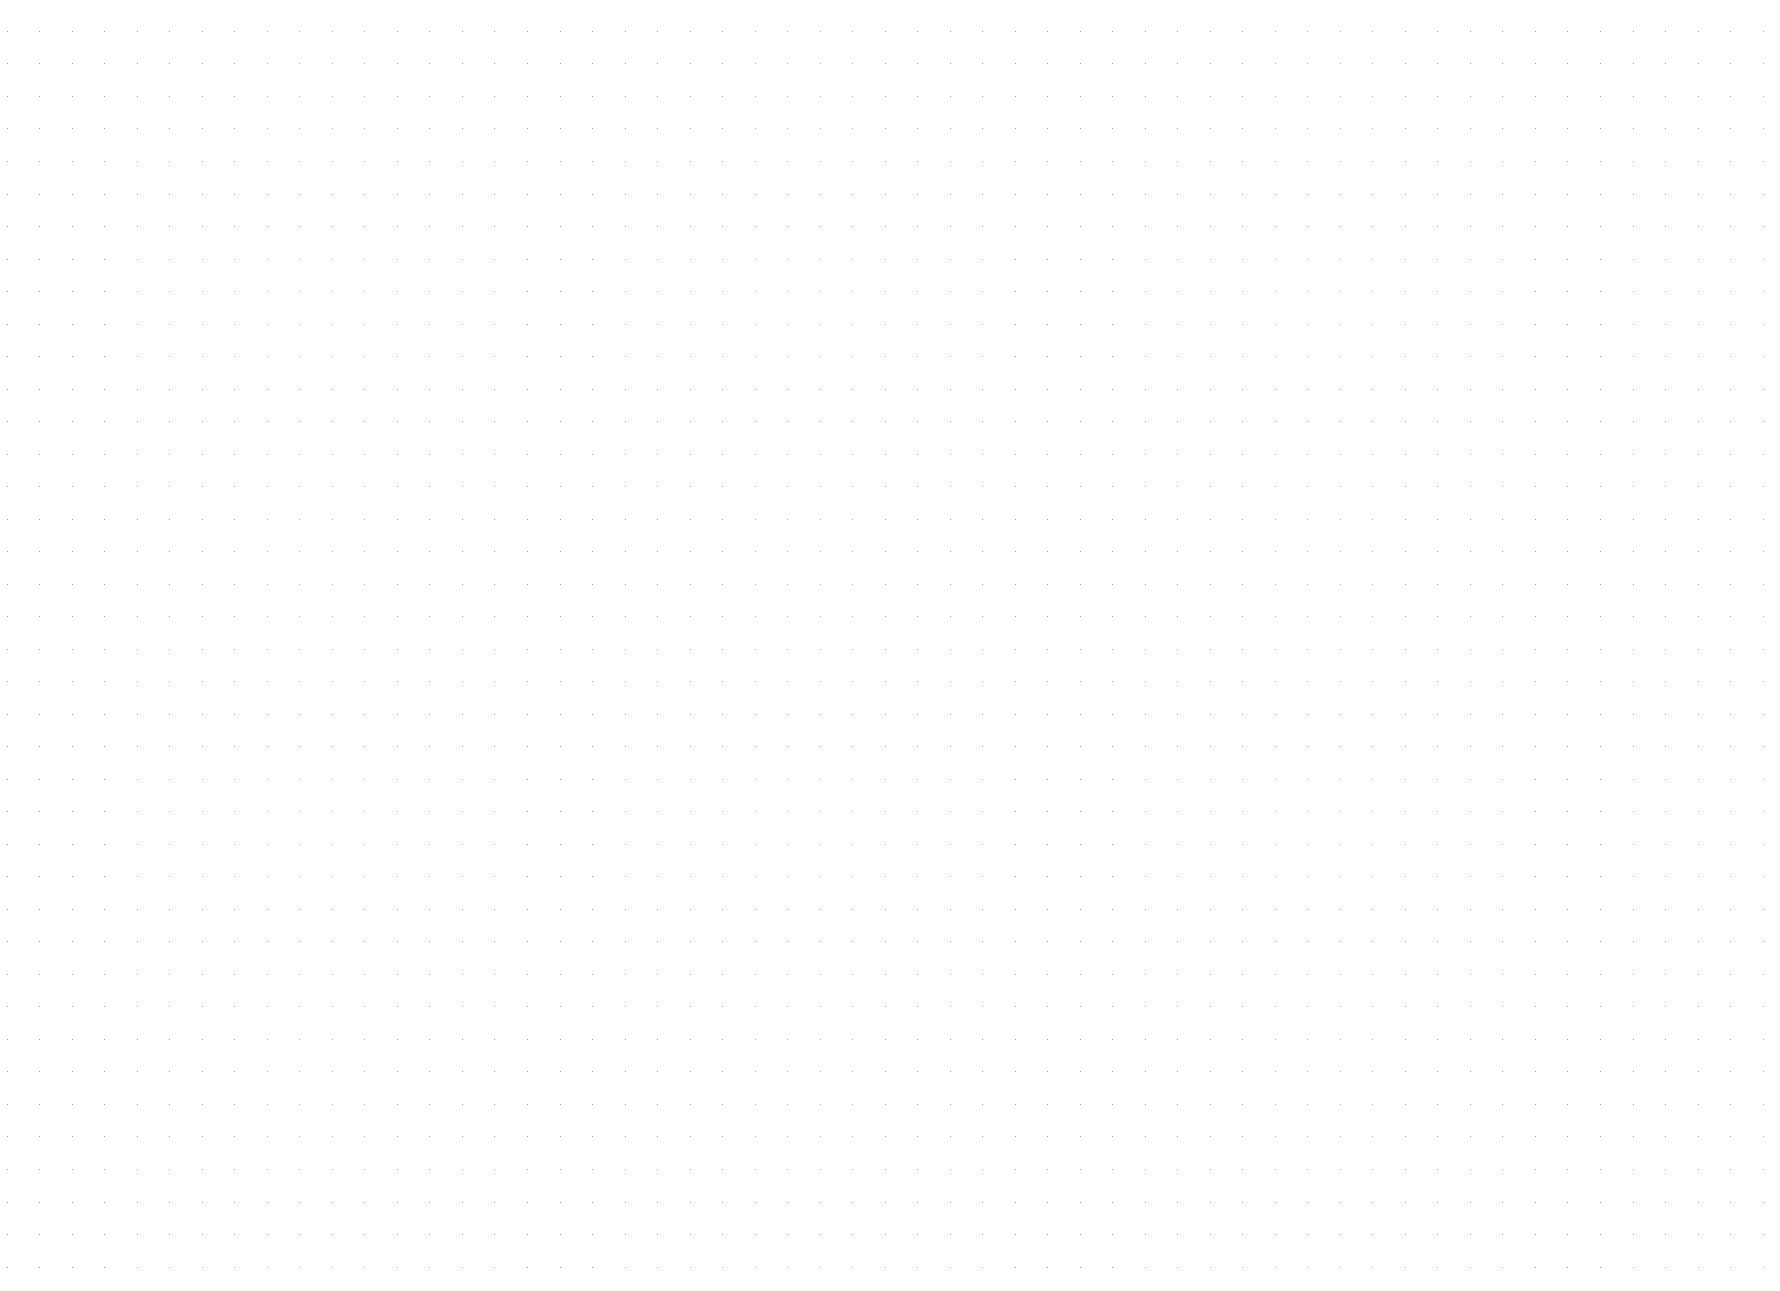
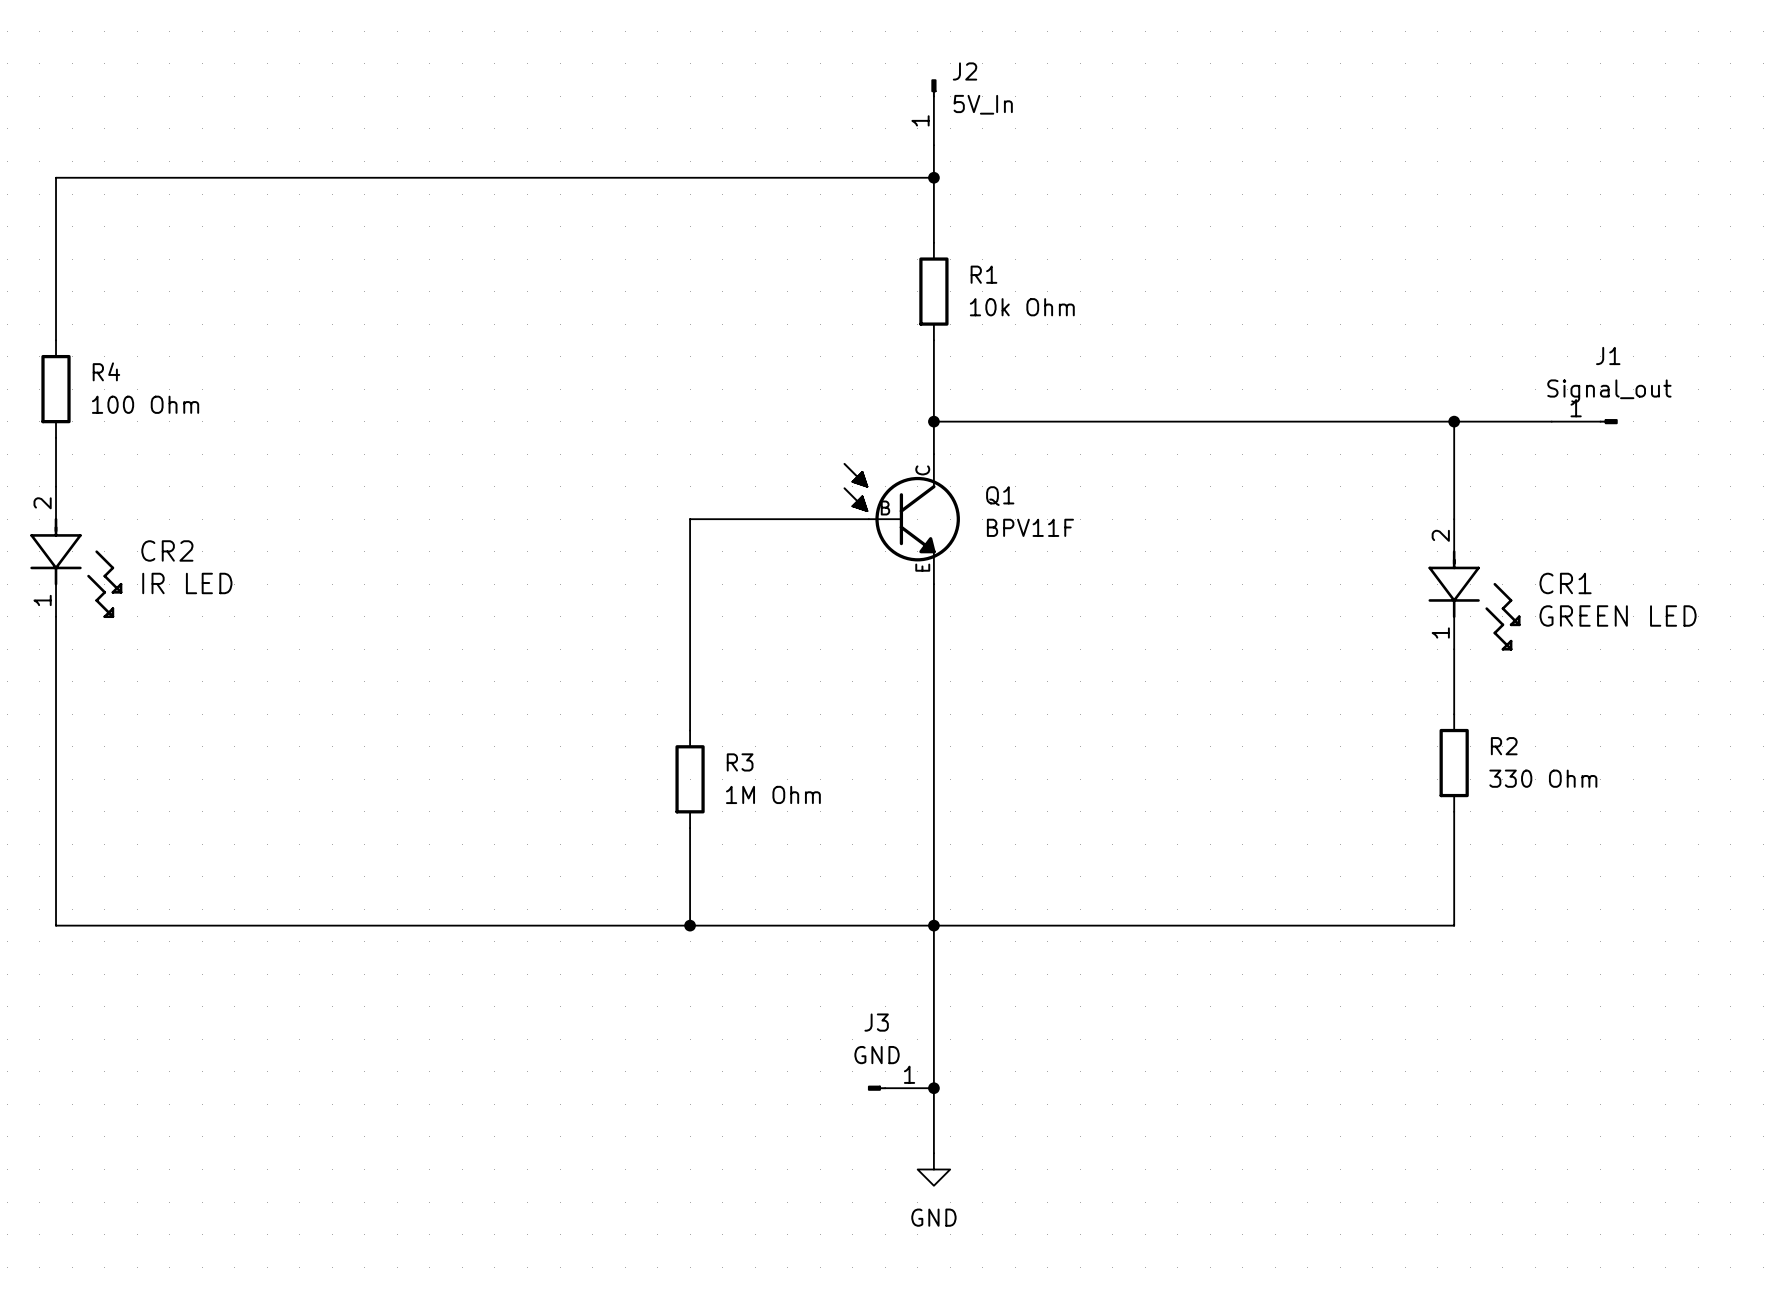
J2: none -> 5V_In (933, 112)
wire: none -> (933, 145) (933, 242)
wire: none -> (933, 177) (56, 177) (56, 340)
junction: none -> (933, 177)
R1: none -> 10k Ohm (933, 291)
wire: none -> (933, 340) (933, 454)
R4: none -> 100 Ohm (56, 389)
wire: none -> (933, 421) (1551, 421)
junction: none -> (933, 421)
wire: none -> (1454, 421) (1454, 519)
junction: none -> (1454, 421)
J1: none -> Signal_out (1584, 421)
wire: none -> (56, 437) (56, 486)
wire: none -> (868, 519) (690, 519) (690, 730)
Q1: none -> BPV11F (901, 519)
CR2: none -> IR LED (76, 552)
wire: none -> (933, 584) (933, 1153)
CR1: none -> GREEN LED (1474, 584)
wire: none -> (56, 616) (56, 925) (1454, 925) (1454, 811)
wire: none -> (1454, 649) (1454, 714)
R2: none -> 330 Ohm (1454, 763)
R3: none -> 1M Ohm (690, 779)
wire: none -> (690, 828) (690, 925)
junction: none -> (690, 925)
junction: none -> (933, 925)
J3: none -> GND (900, 1088)
junction: none -> (933, 1088)
power symbol: none -> GND (933, 1169)

